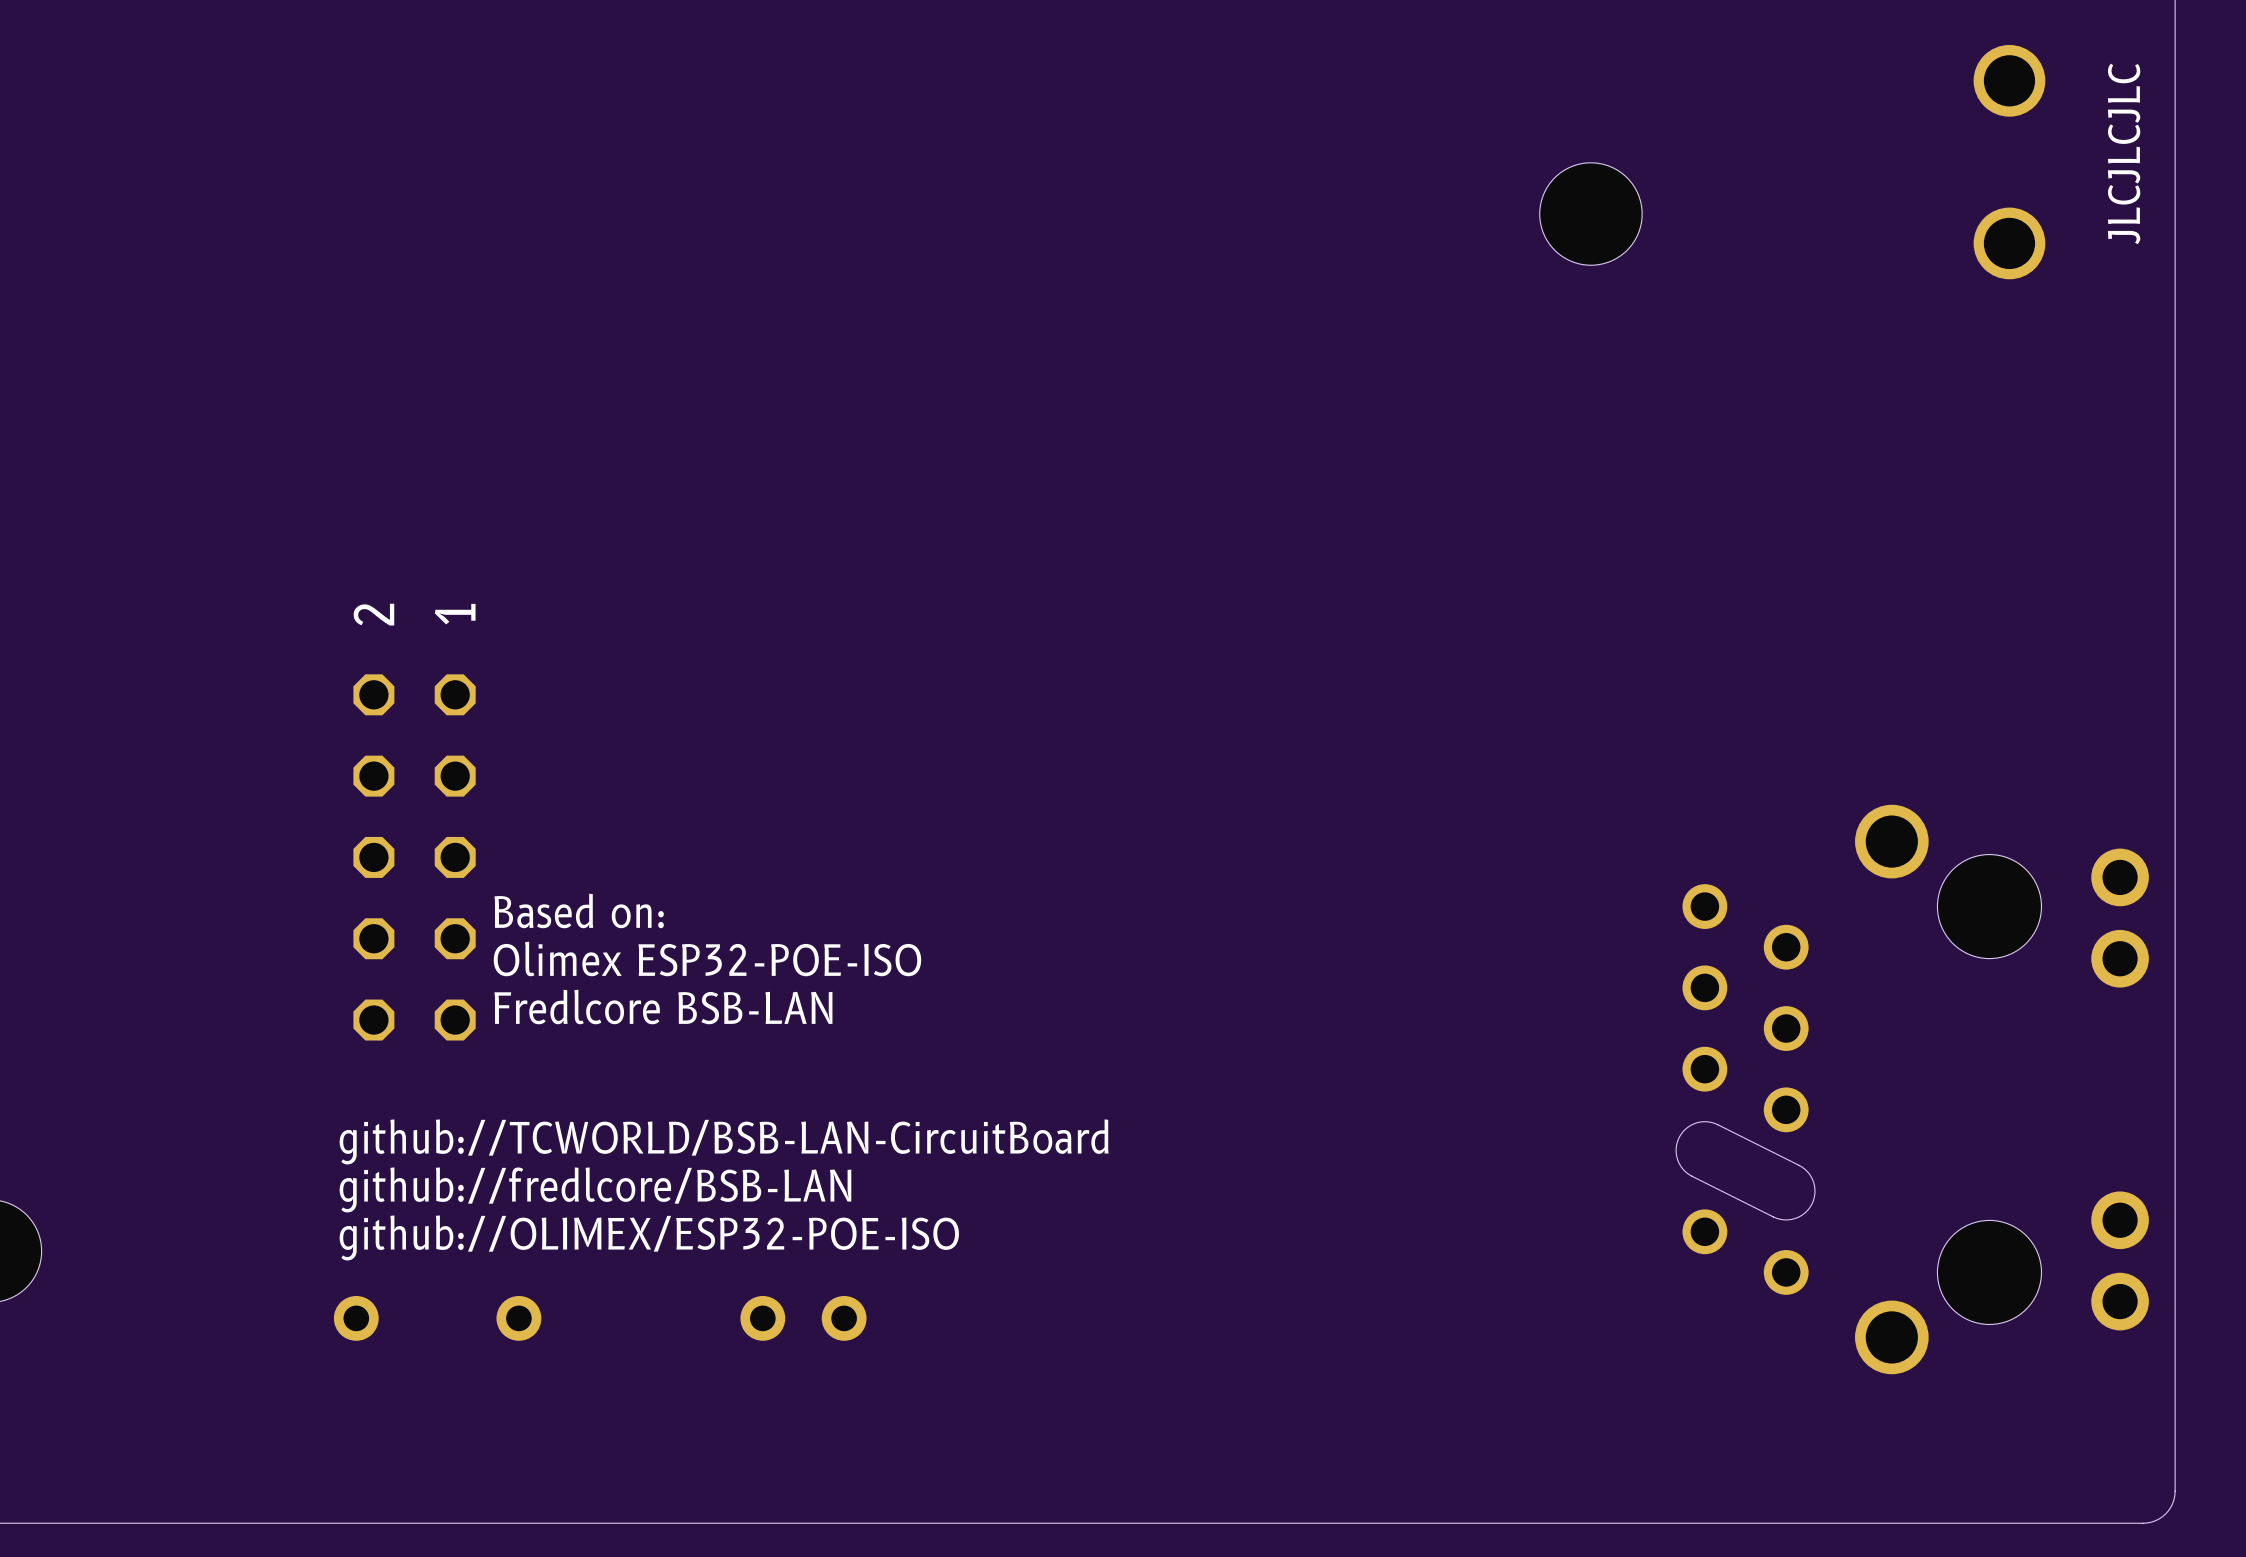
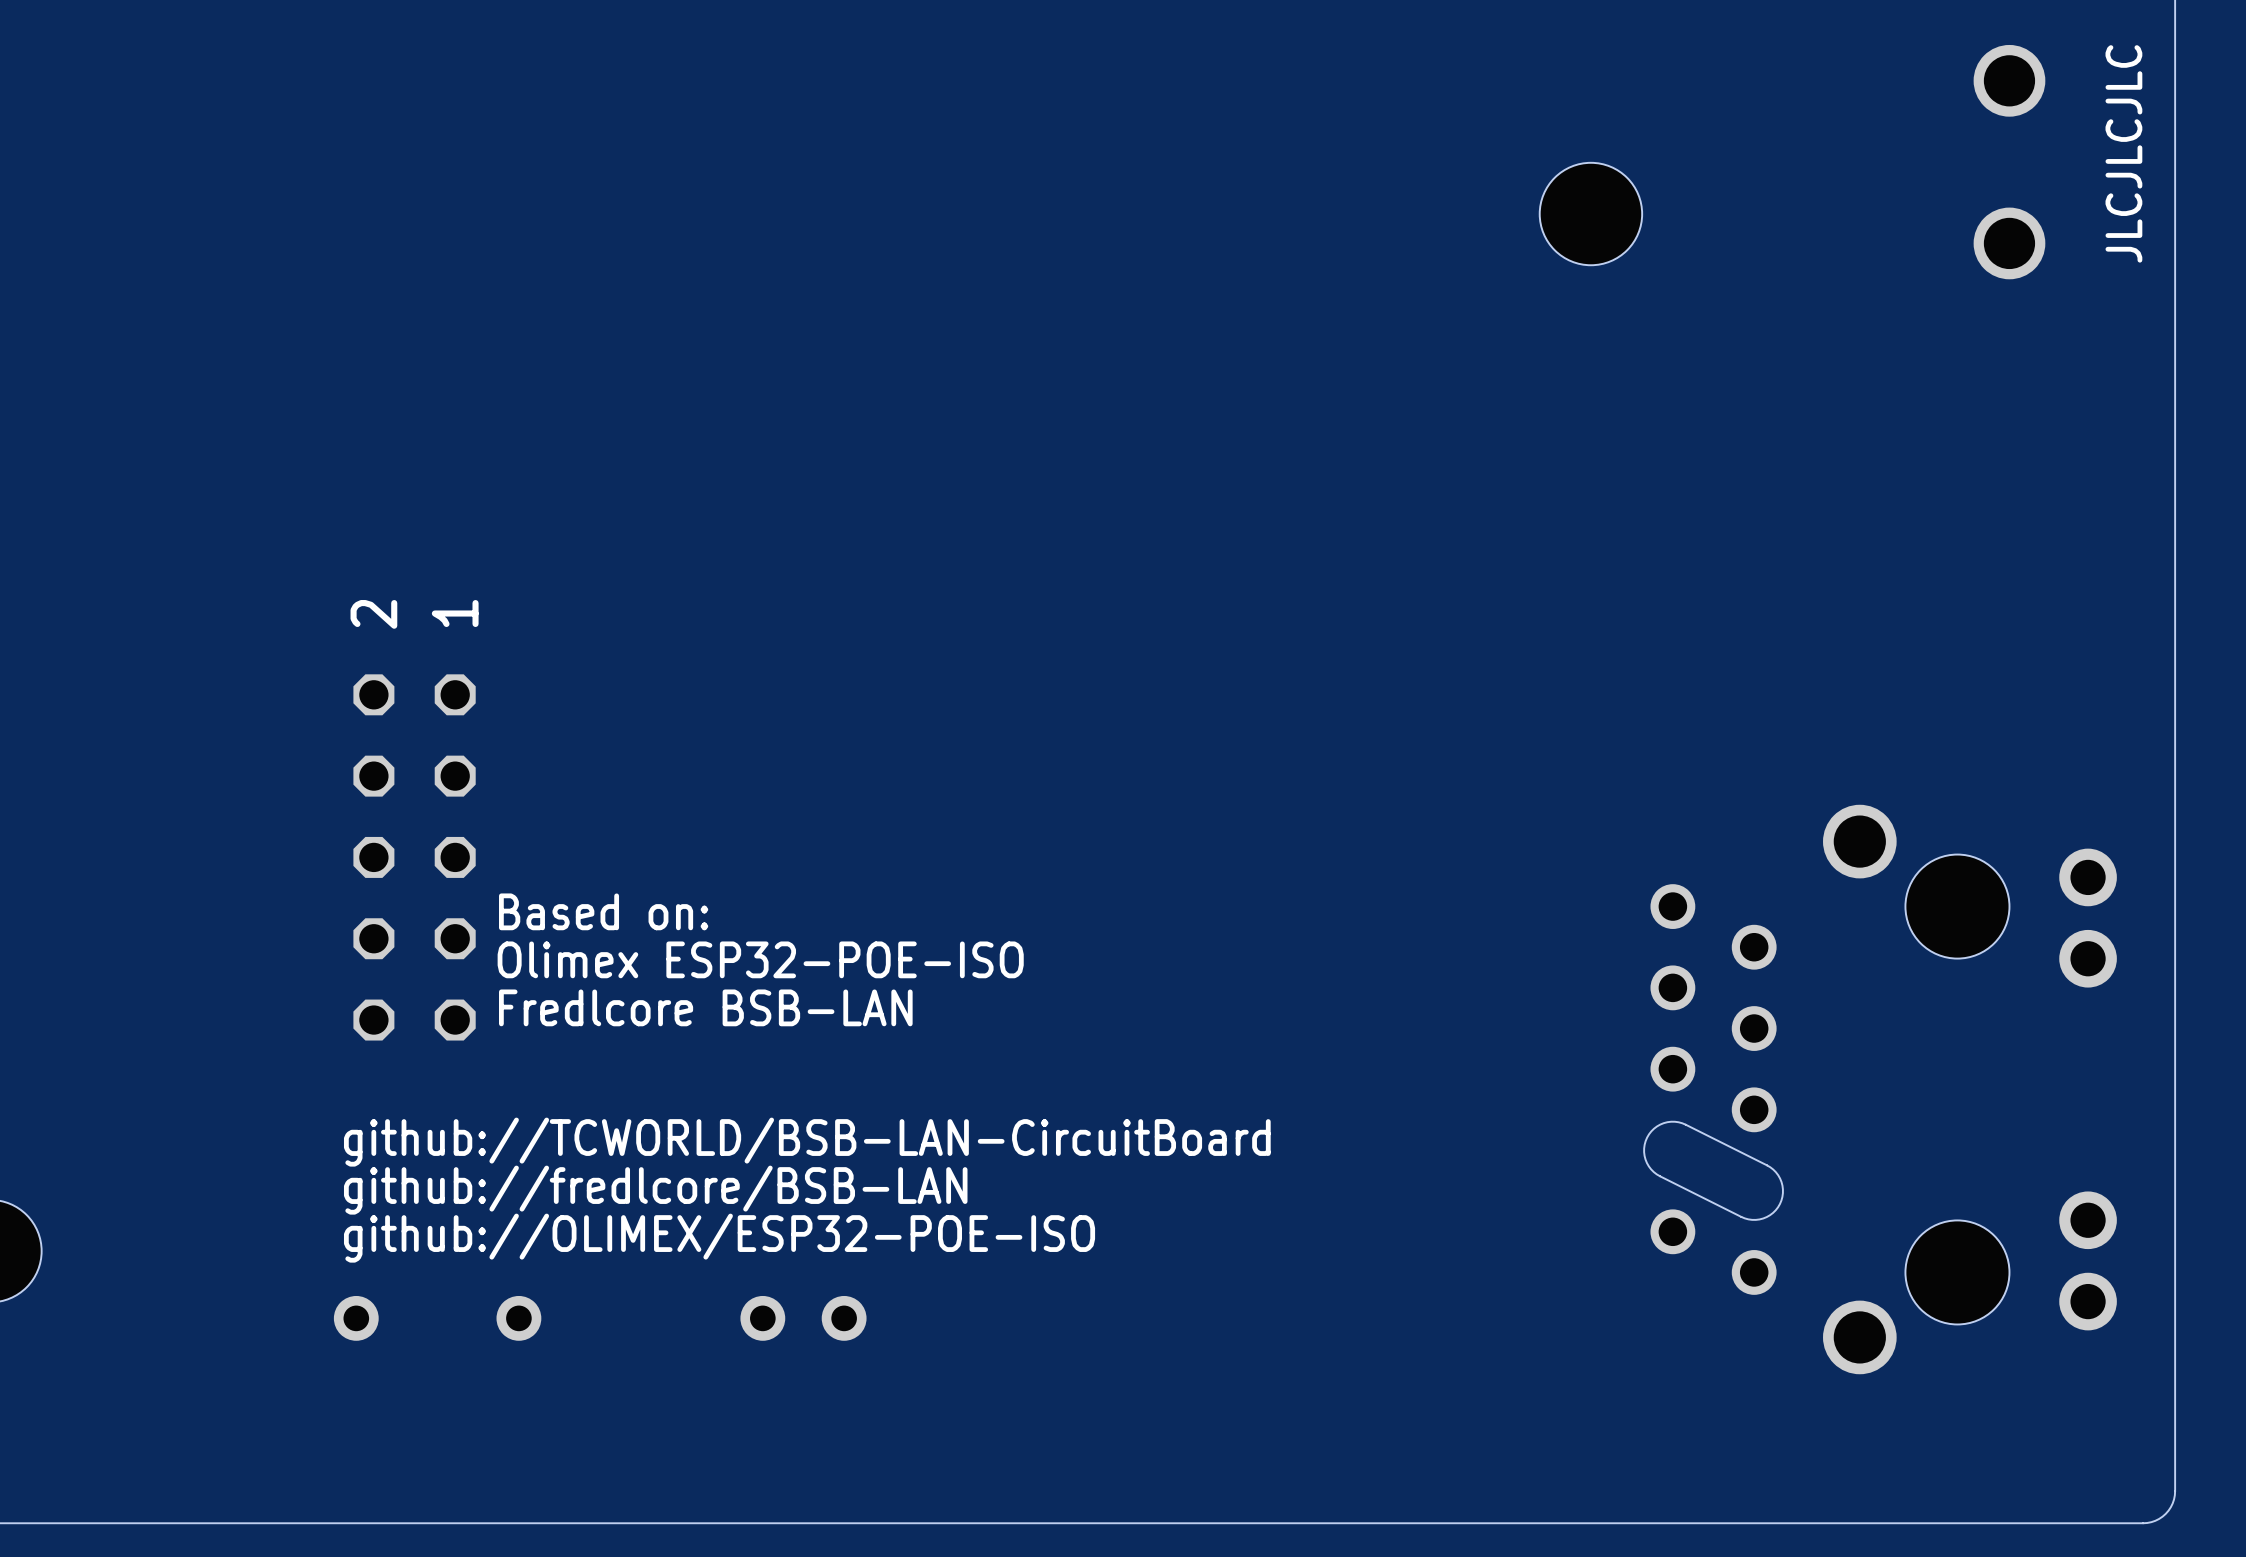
part position: (1912, 1089) -> (1880, 1089)

